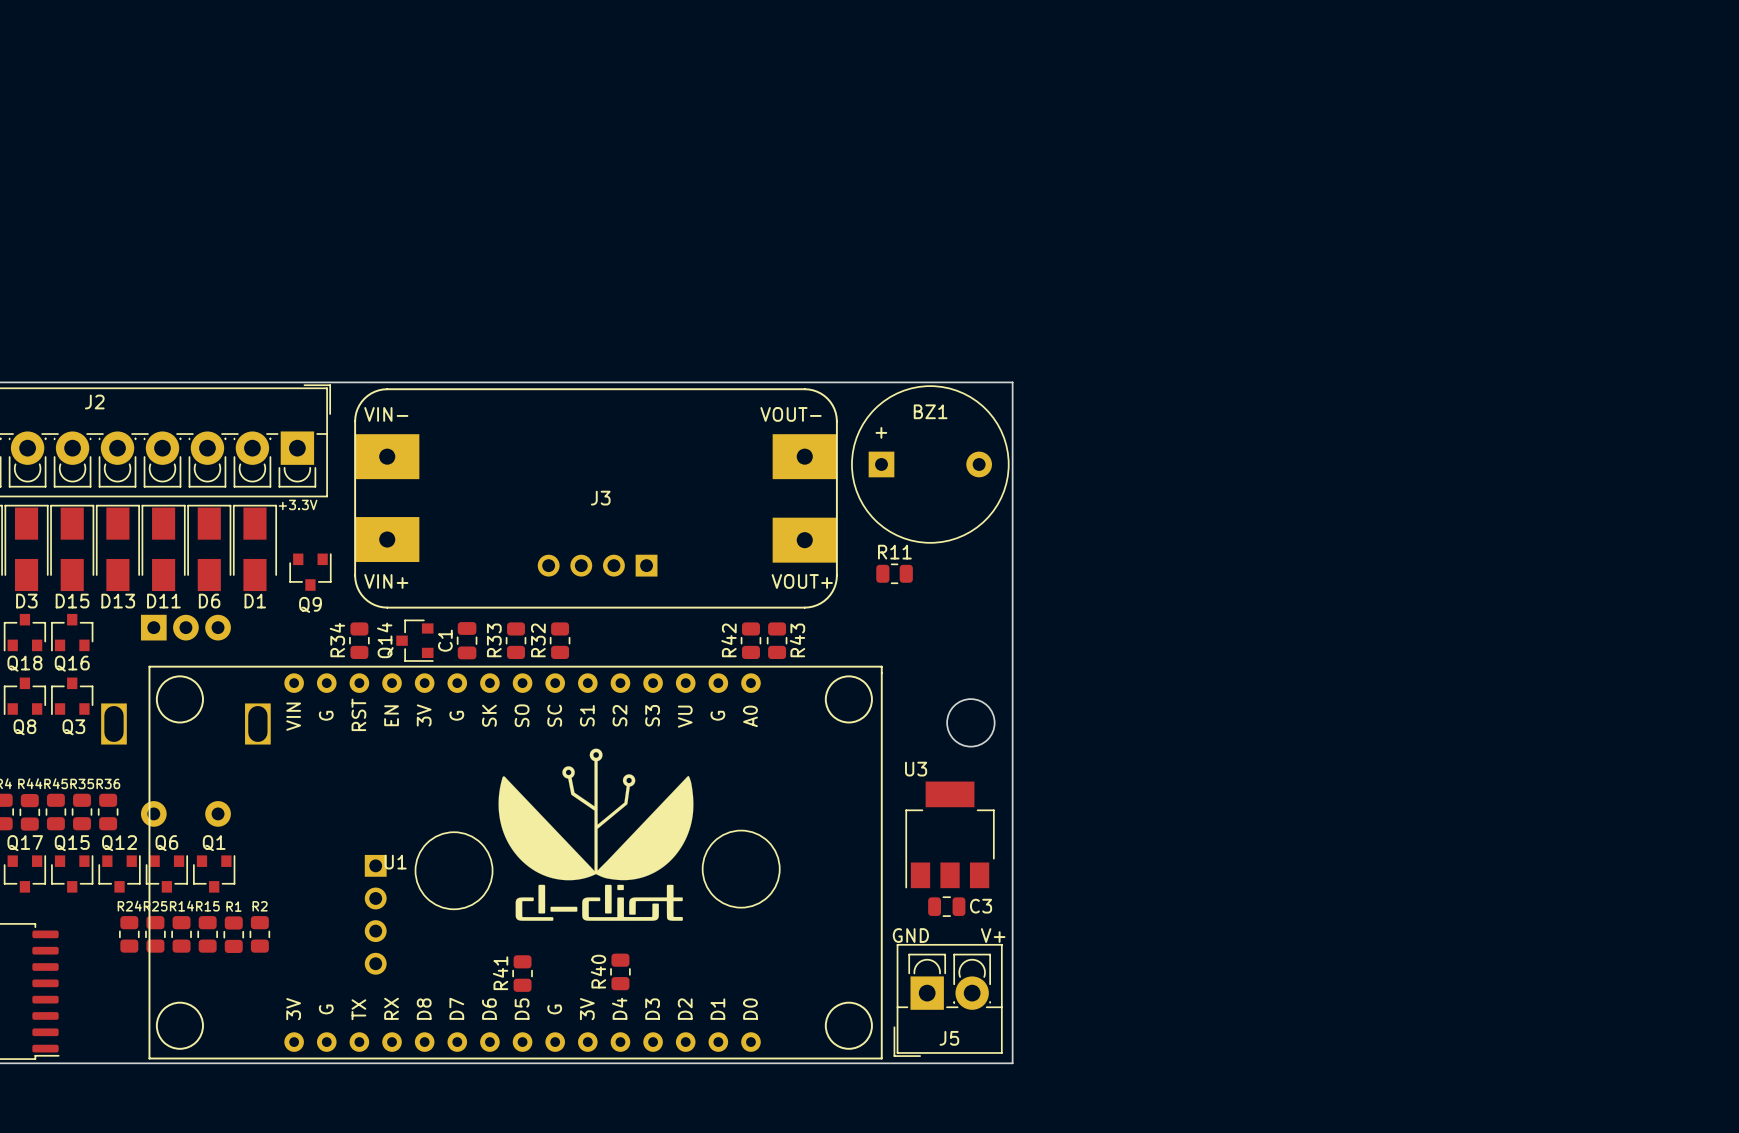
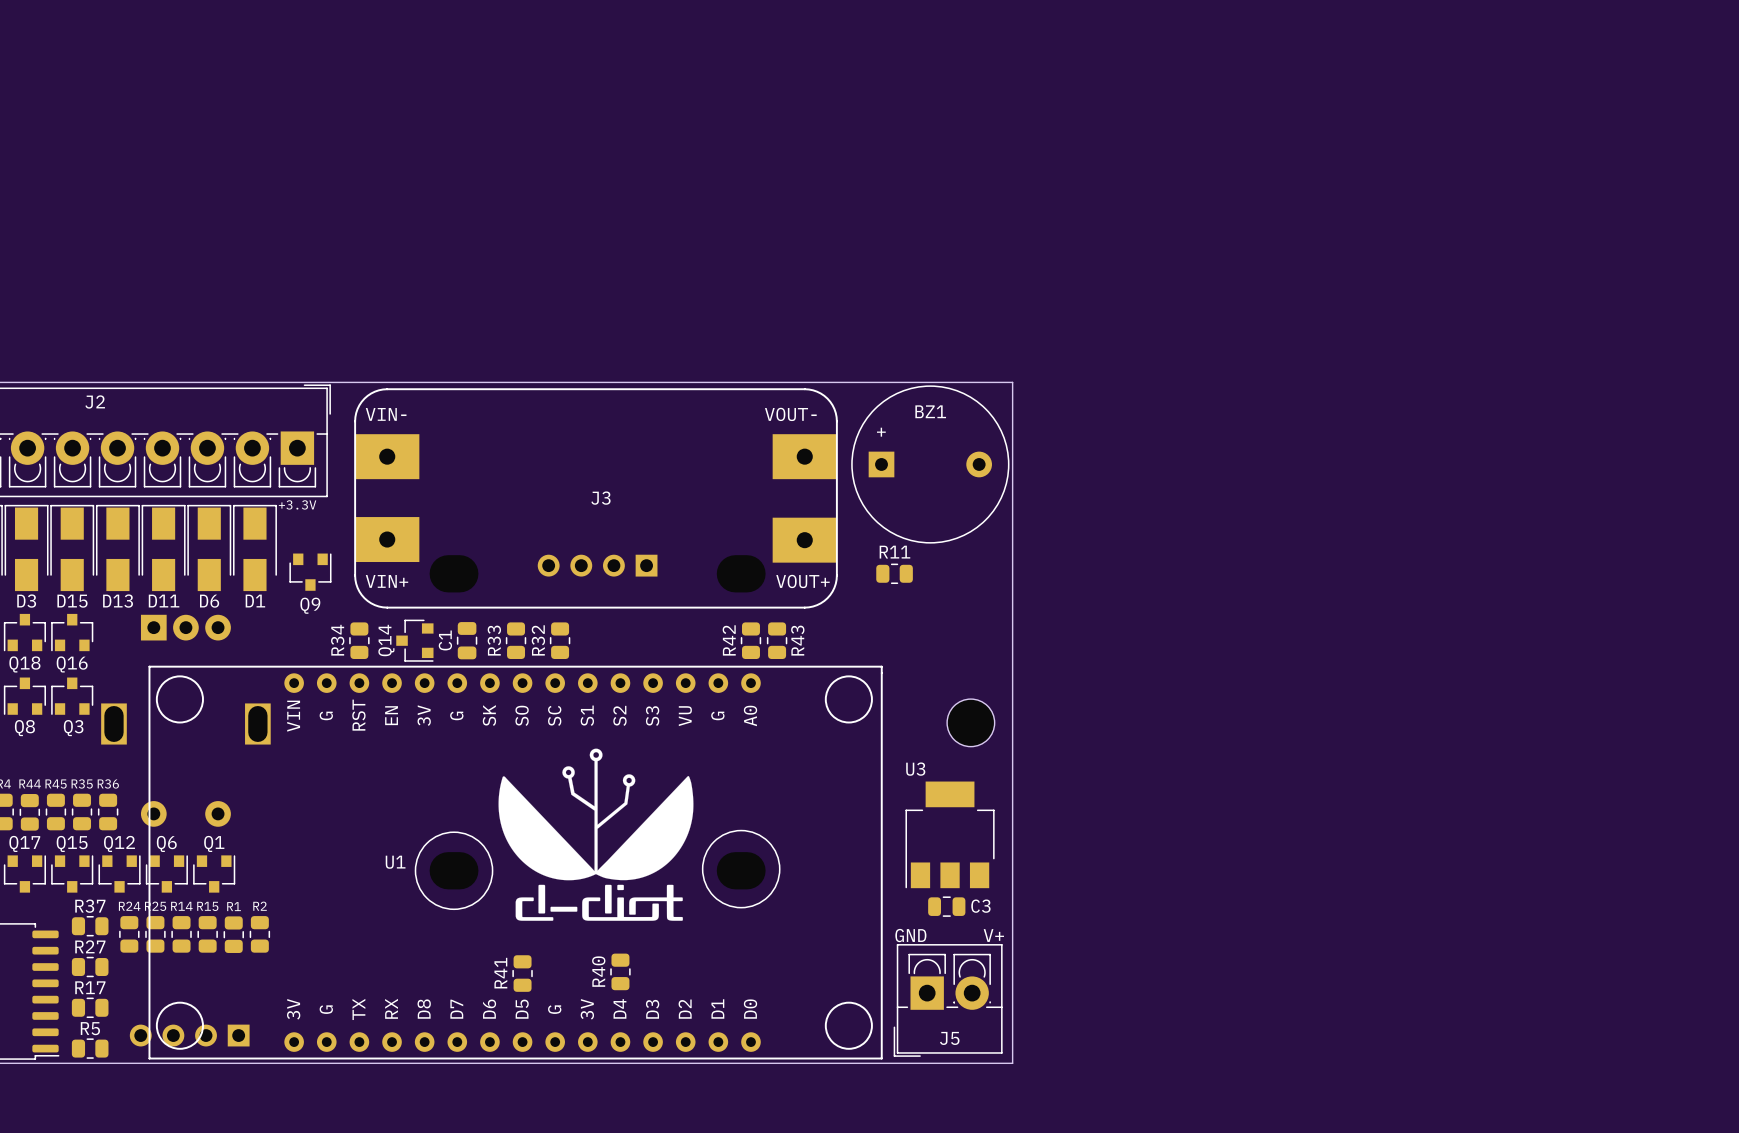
part rotation: 0° (375, 914) -> 90° clockwise (189, 1035)
part position: (375, 914) -> (189, 1035)
R37: none -> (90, 926)
R27: none -> (90, 967)
R17: none -> (90, 1007)
R5: none -> (90, 1048)

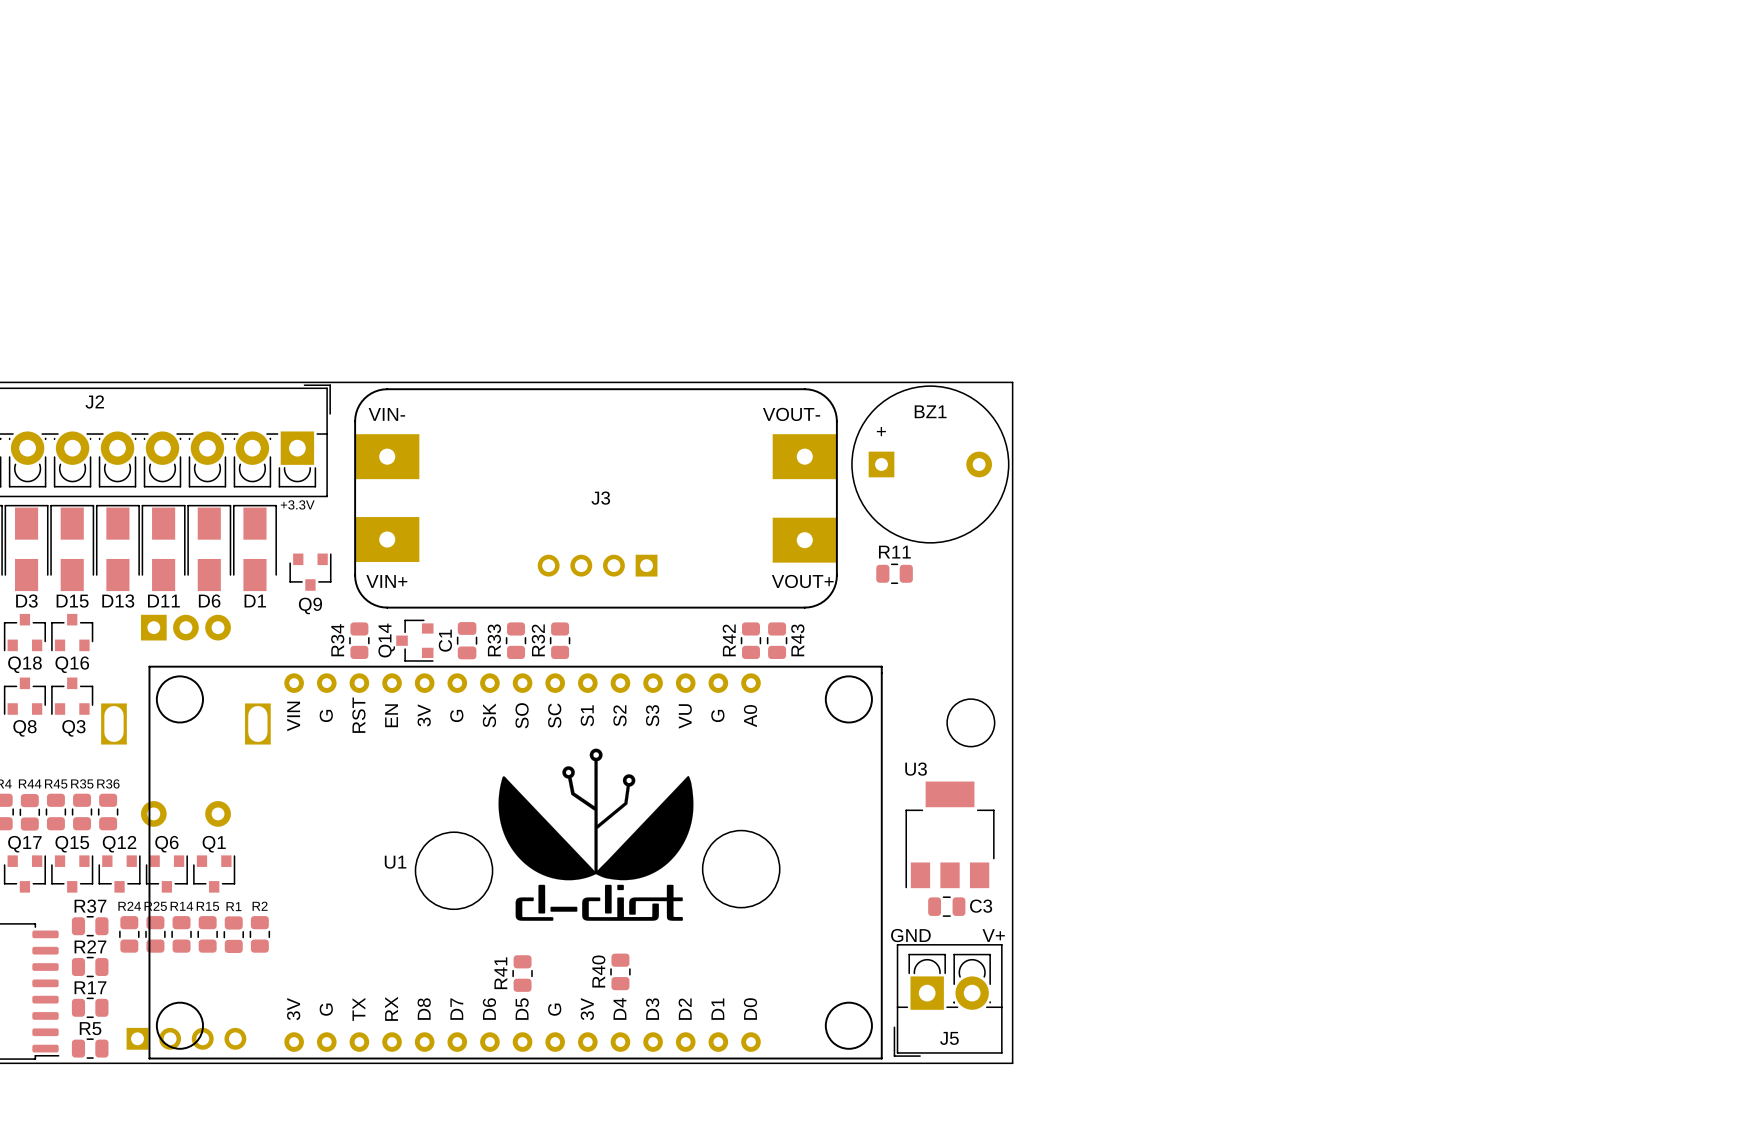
part rotation: 0° (189, 1035) -> 180° (186, 1038)

